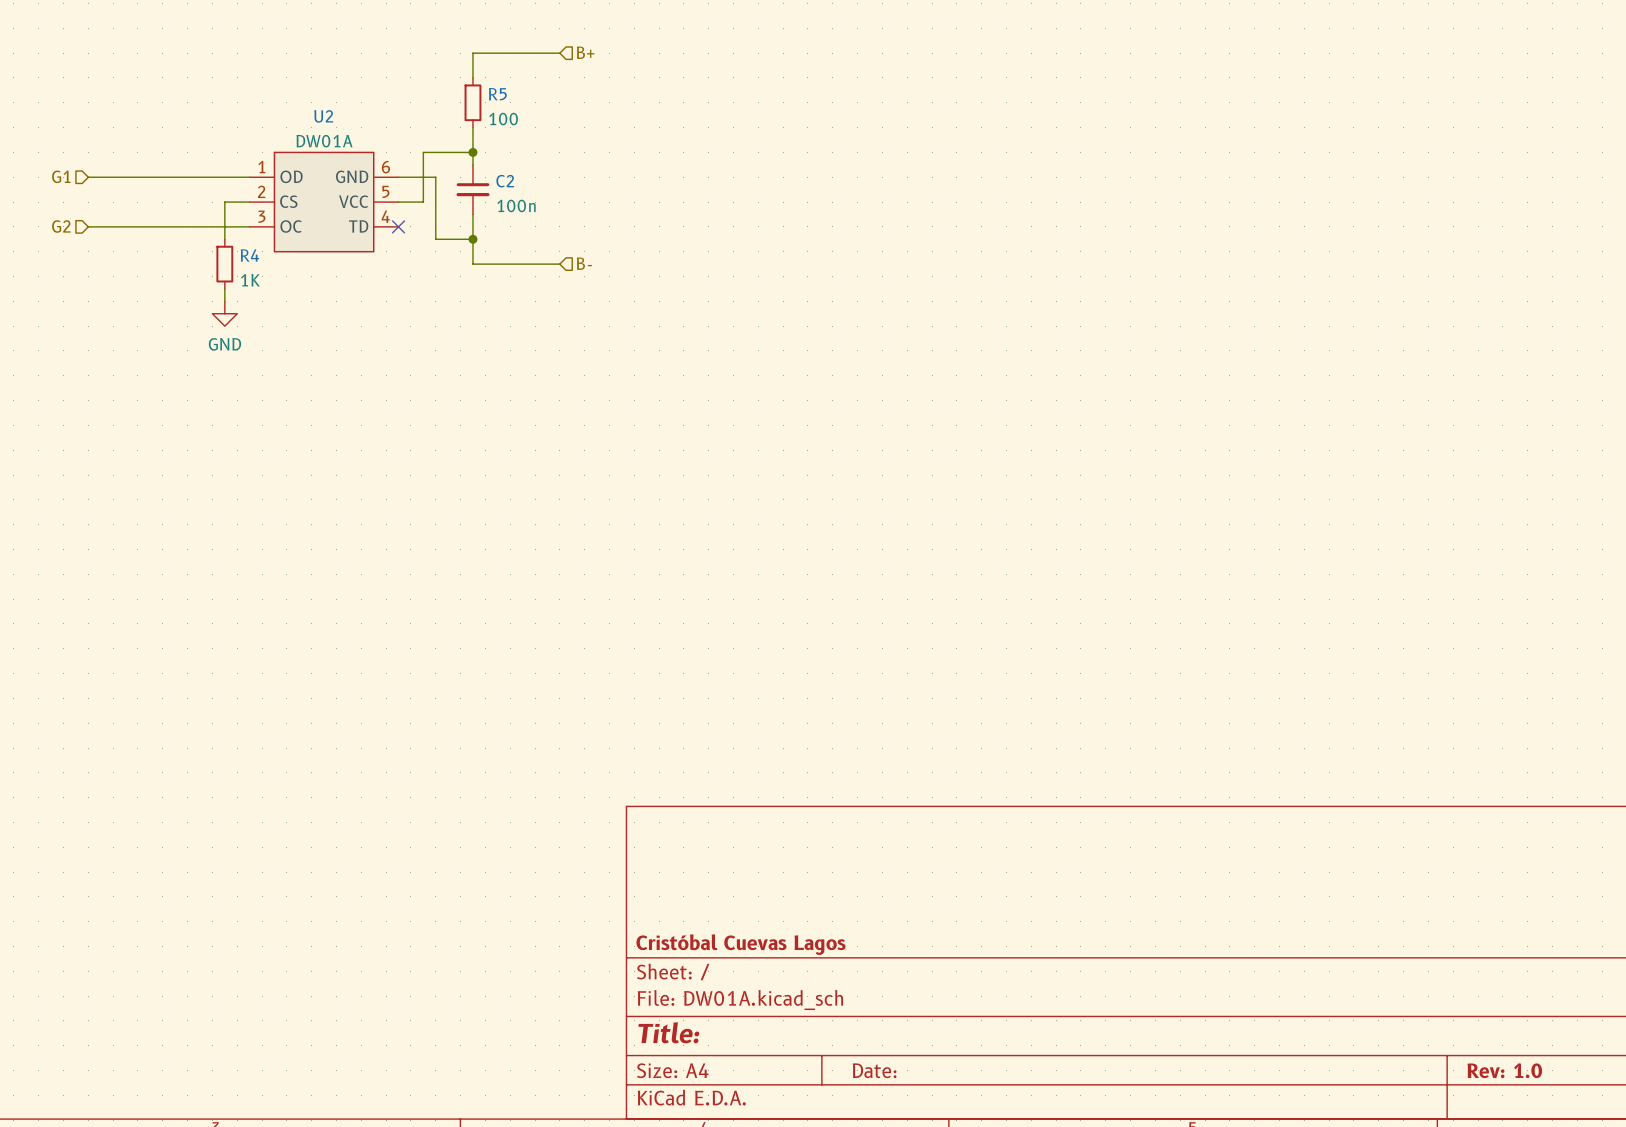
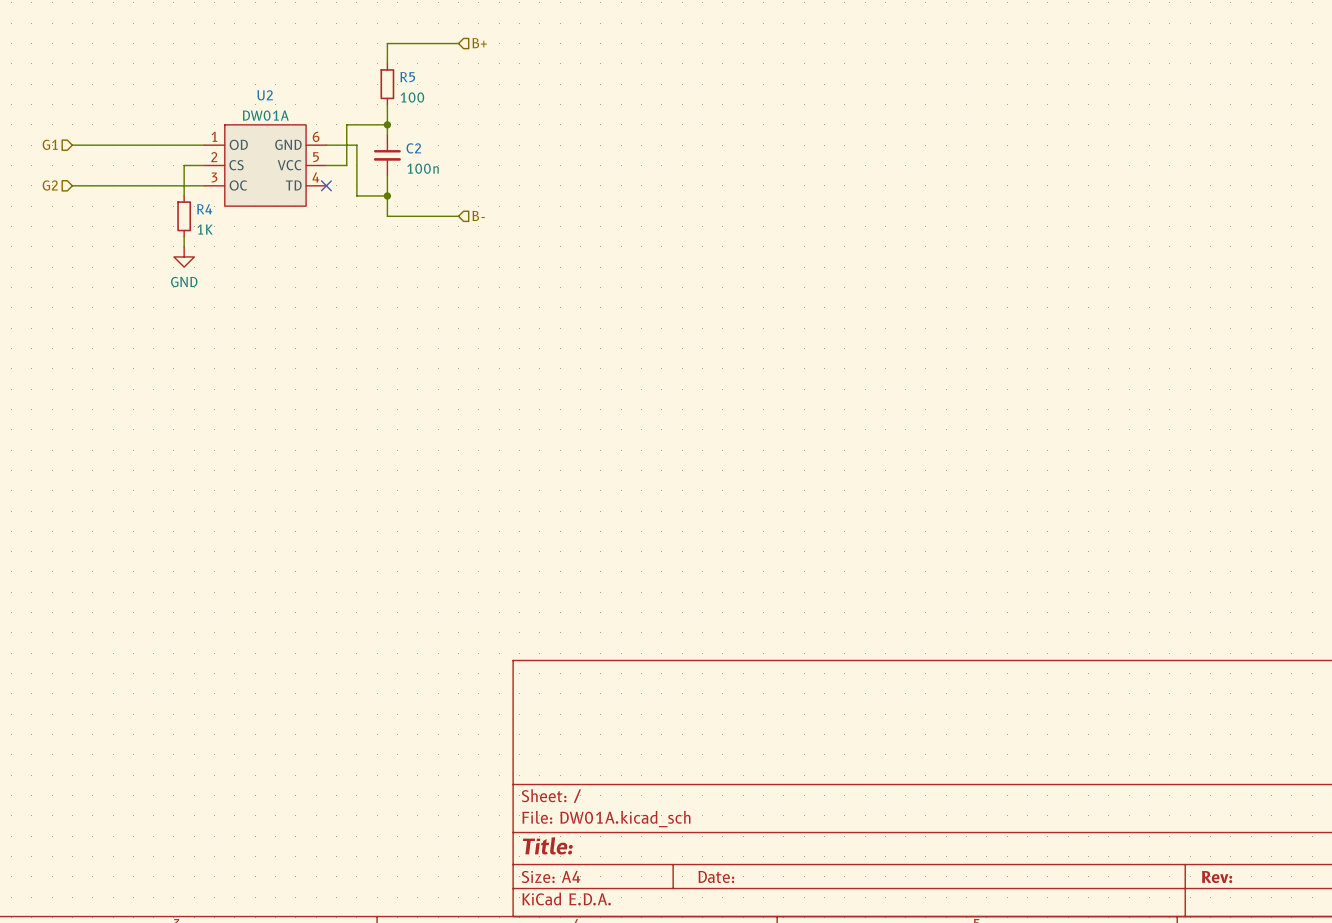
title block: Cristóbal Cuevas Lagos (741, 944) -> none
title block: Rev: 1.0 (1504, 1070) -> Rev: (1217, 877)

